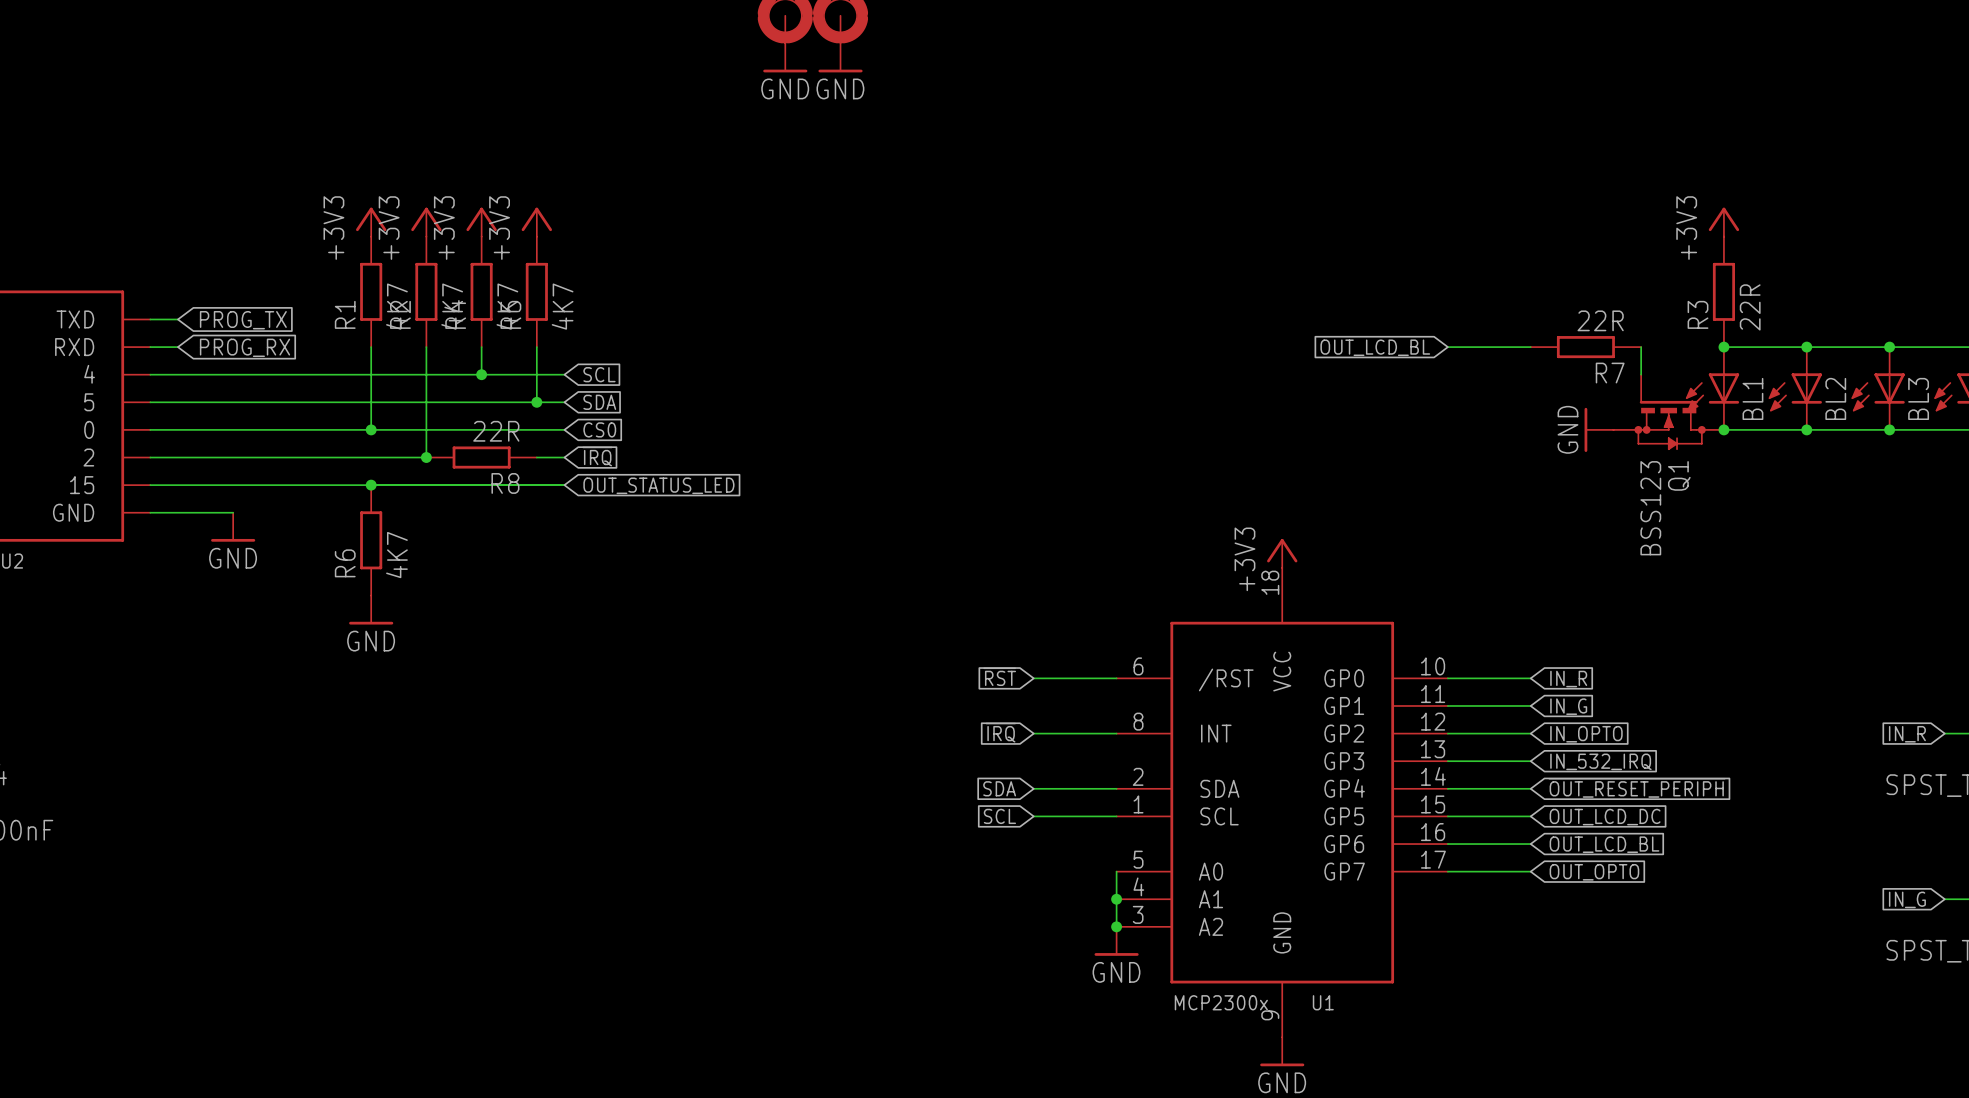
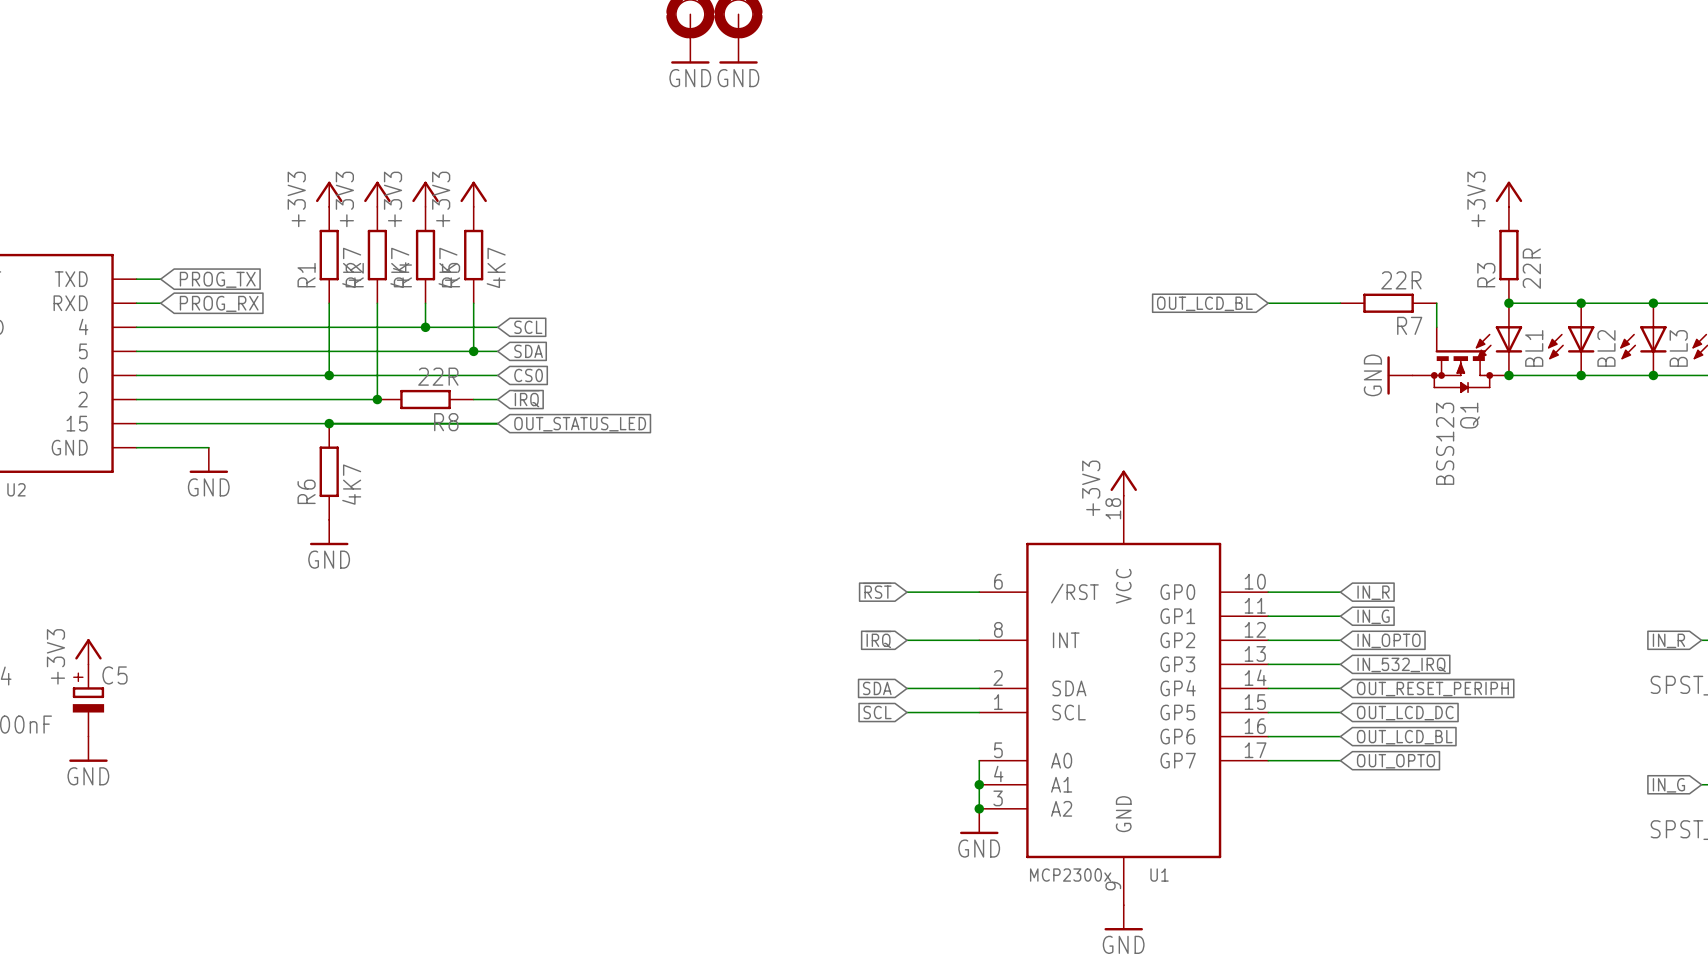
power symbol: none -> +3V3 (88, 651)
C5: none -> (88, 700)
power symbol: none -> GND (88, 749)

